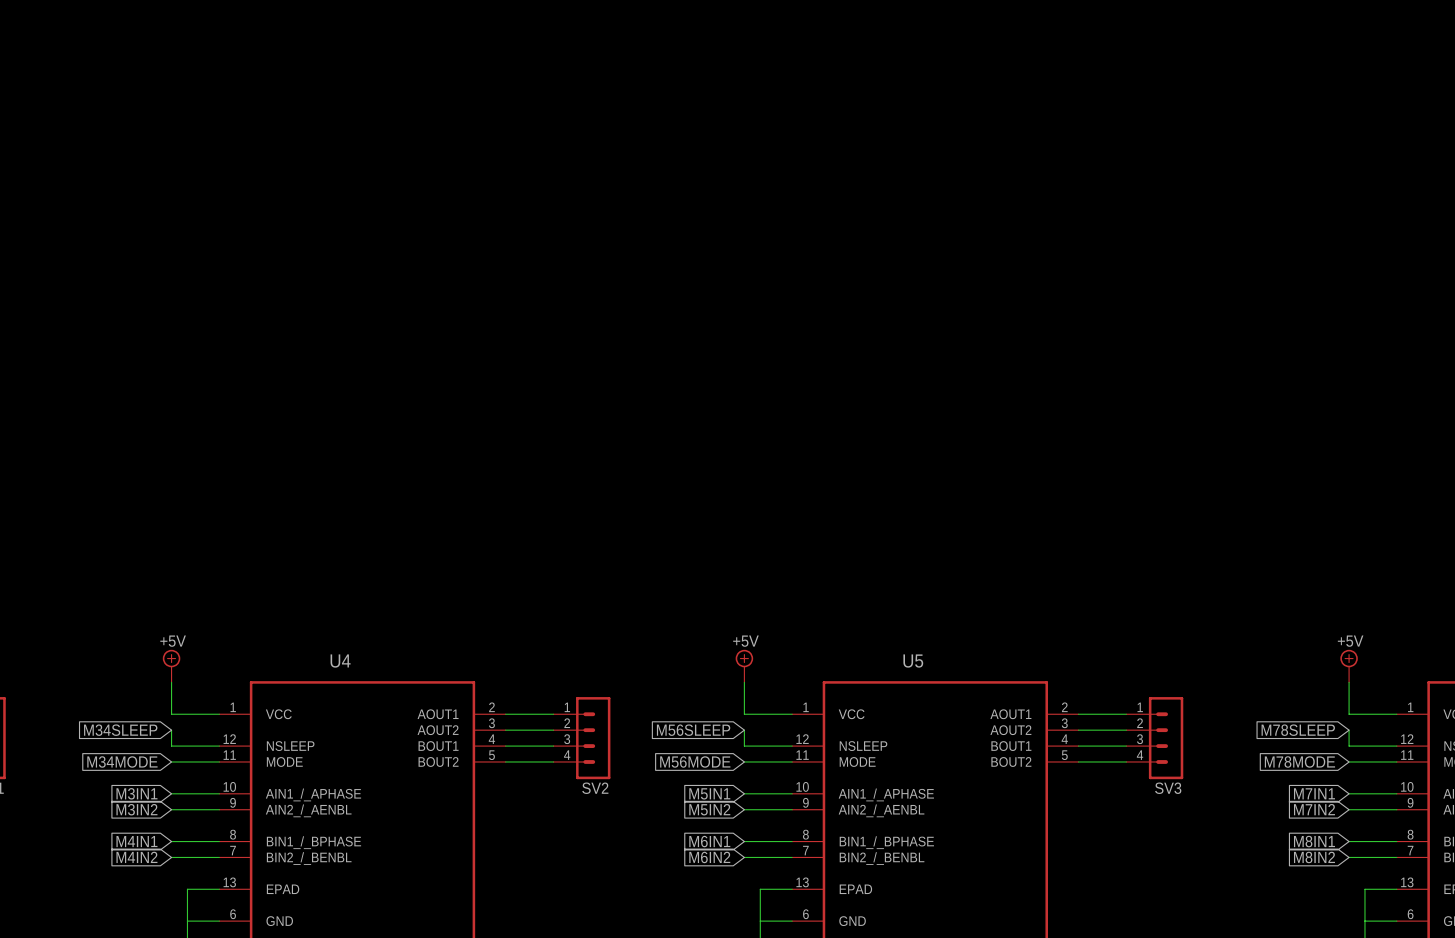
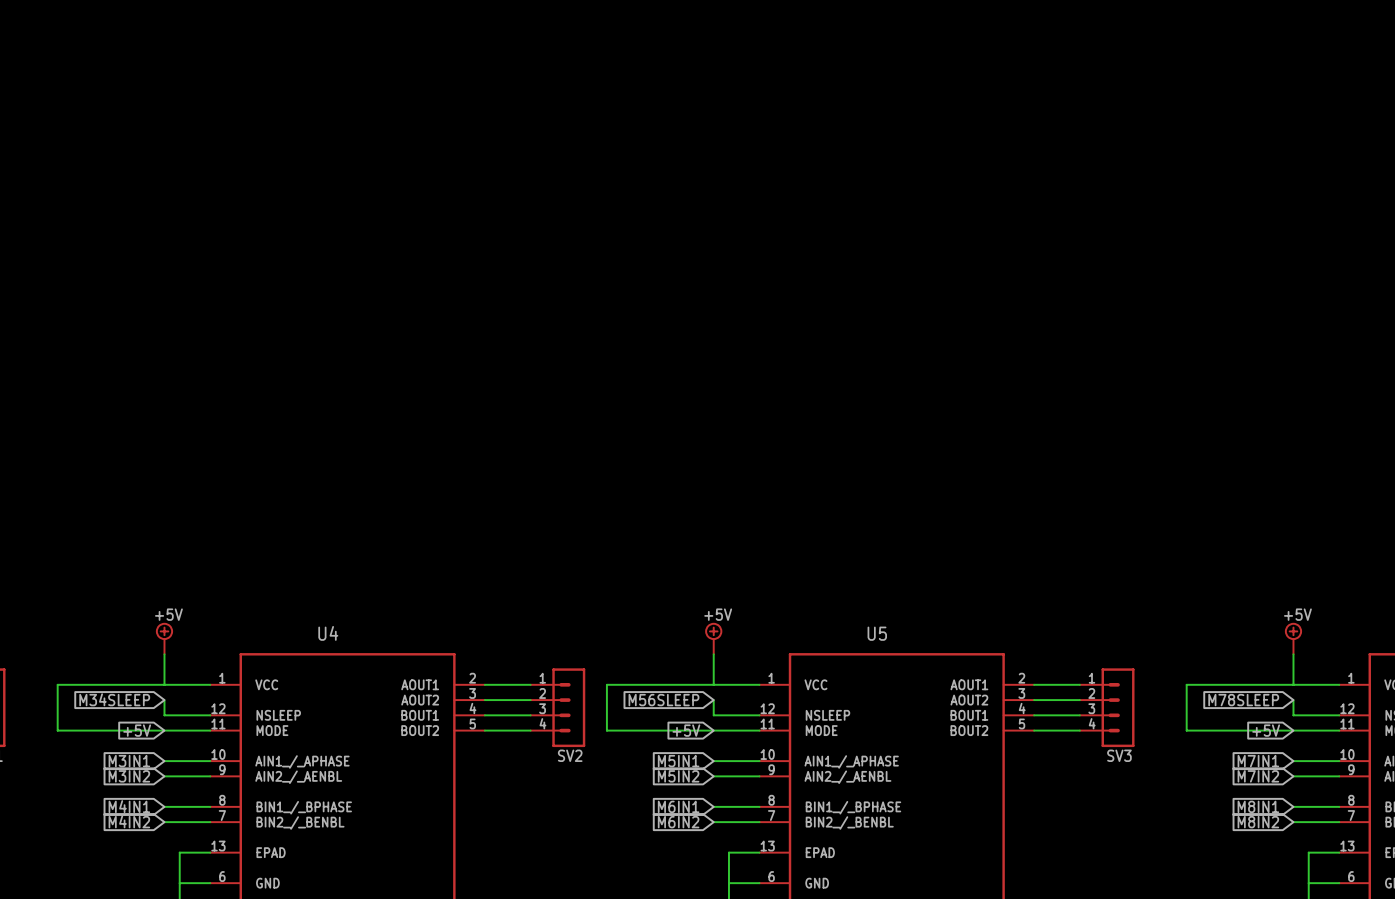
wire: none -> (164, 684) (57, 684) (57, 730) (164, 730)
wire: none -> (713, 684) (606, 684) (606, 730) (713, 730)
wire: none -> (1293, 684) (1186, 684) (1186, 730) (1293, 730)
global label: M34MODE (122, 761) -> +5V (137, 730)
global label: M56MODE (695, 761) -> +5V (686, 730)
global label: M78MODE (1299, 761) -> +5V (1266, 730)

